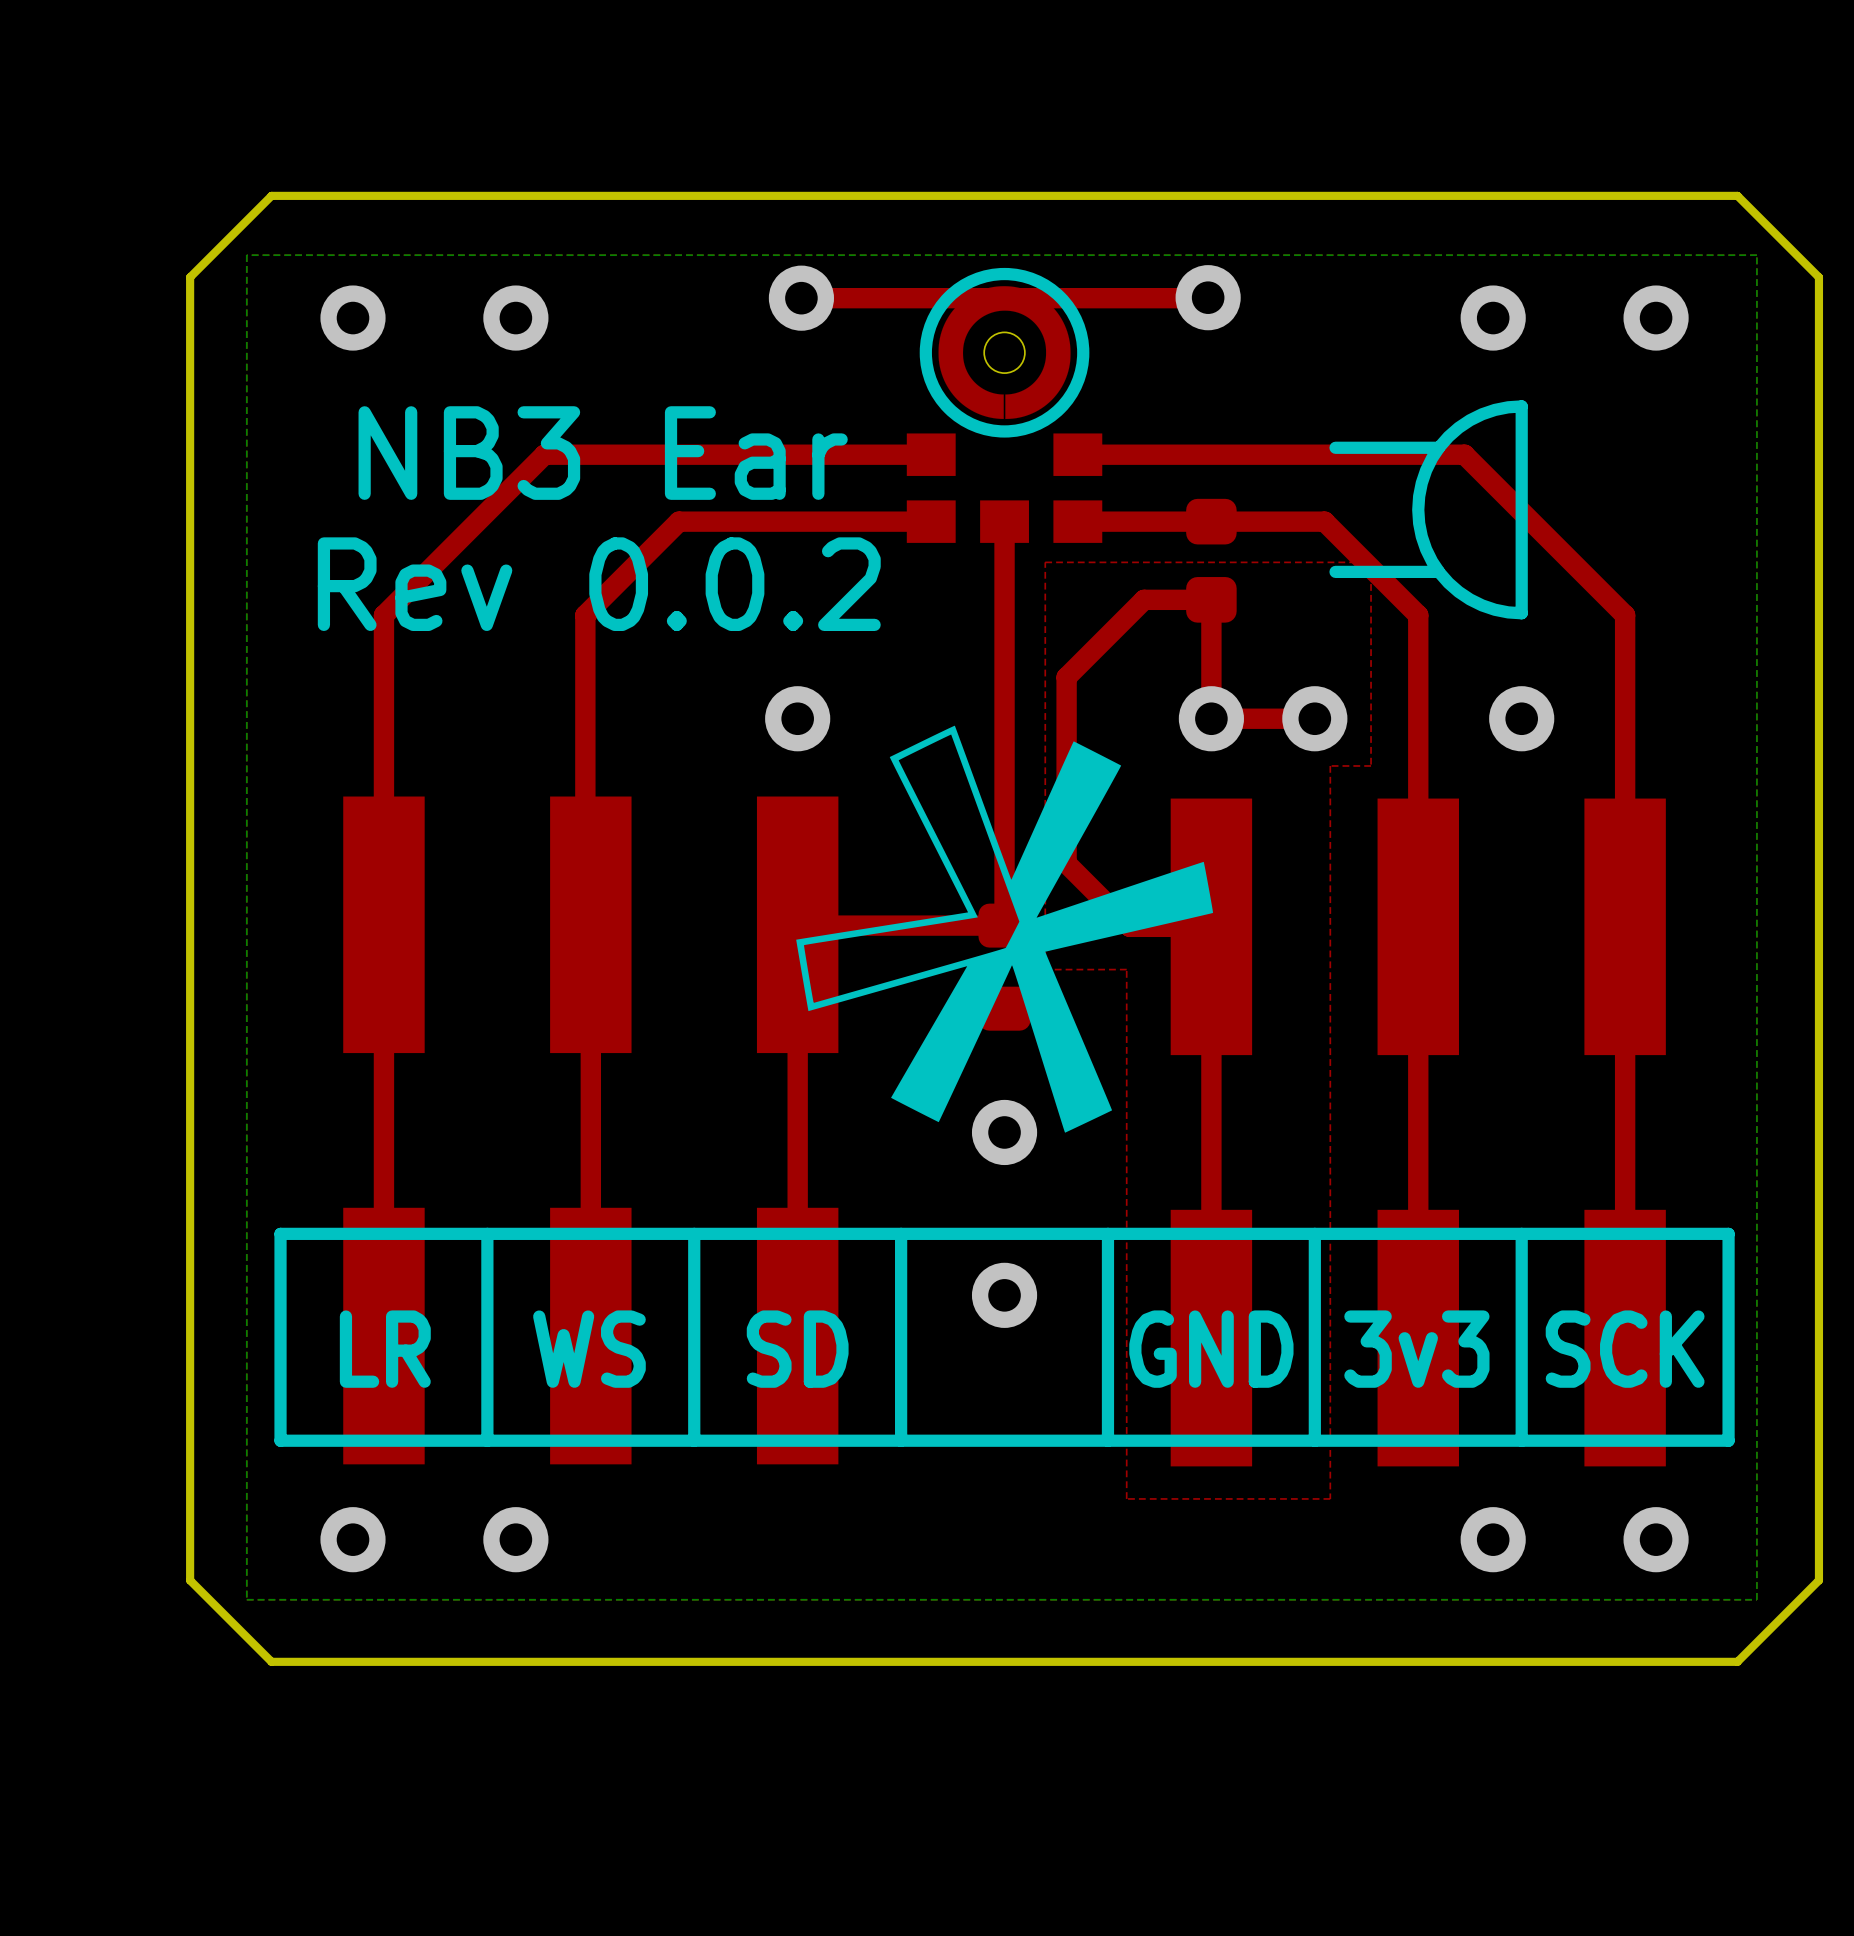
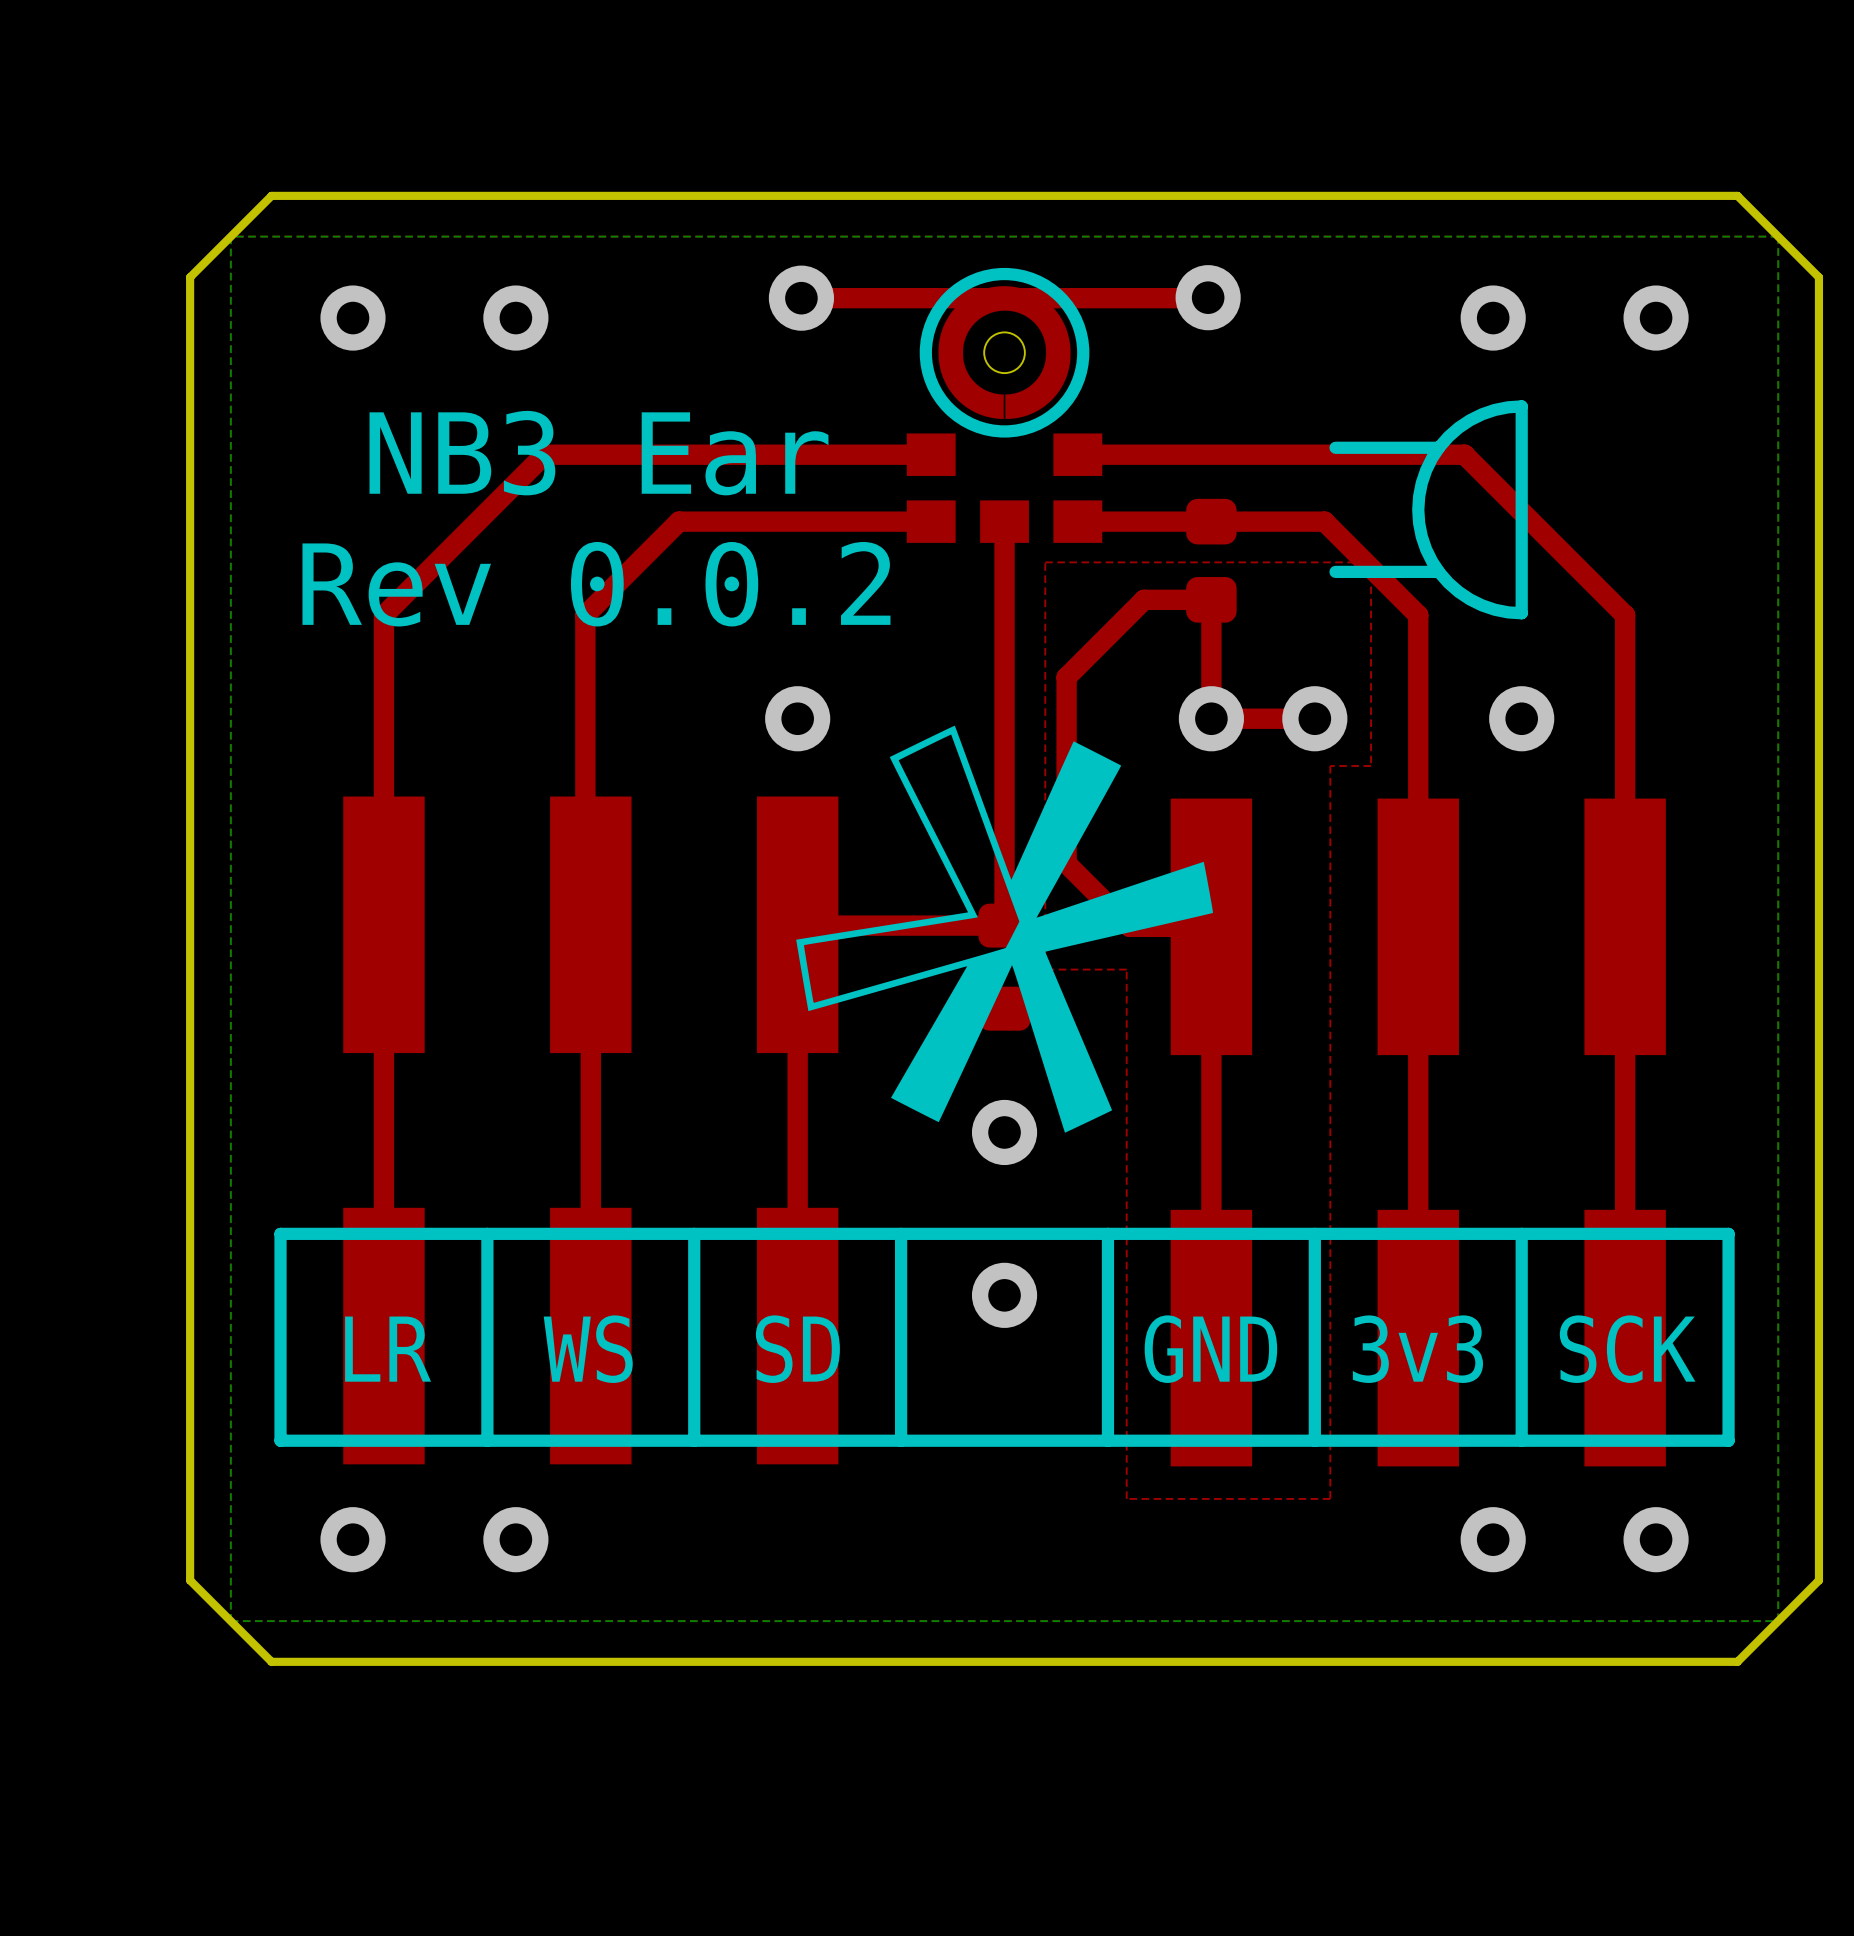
bottom zone outline: (1756, 255) (1756, 1599) (246, 1599) (246, 255) (1756, 255) -> (1778, 236) (1778, 1621) (230, 1621) (230, 236) (1778, 236)

